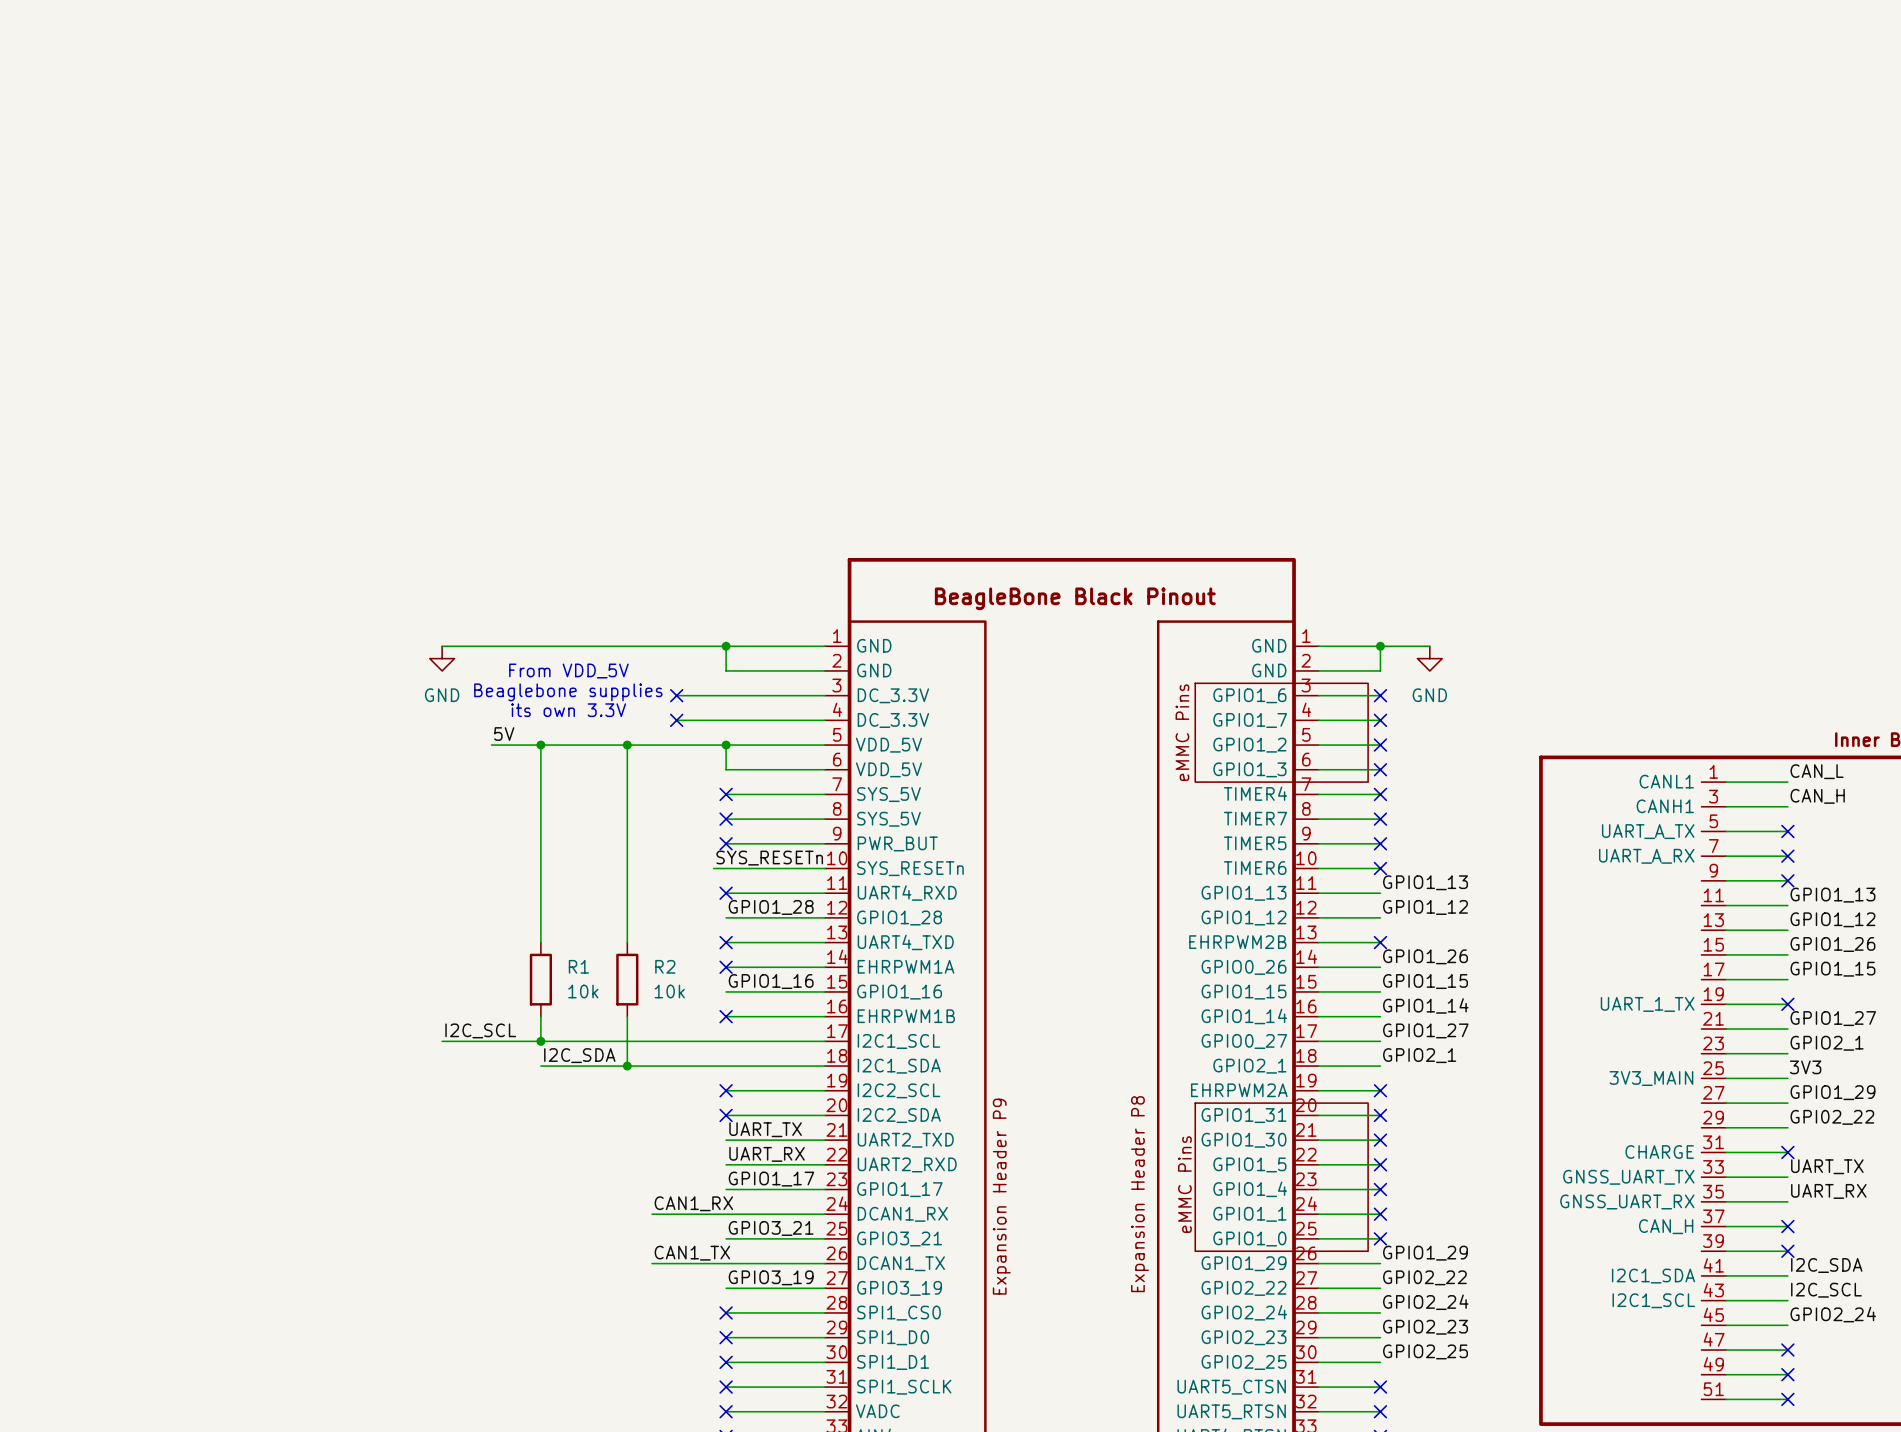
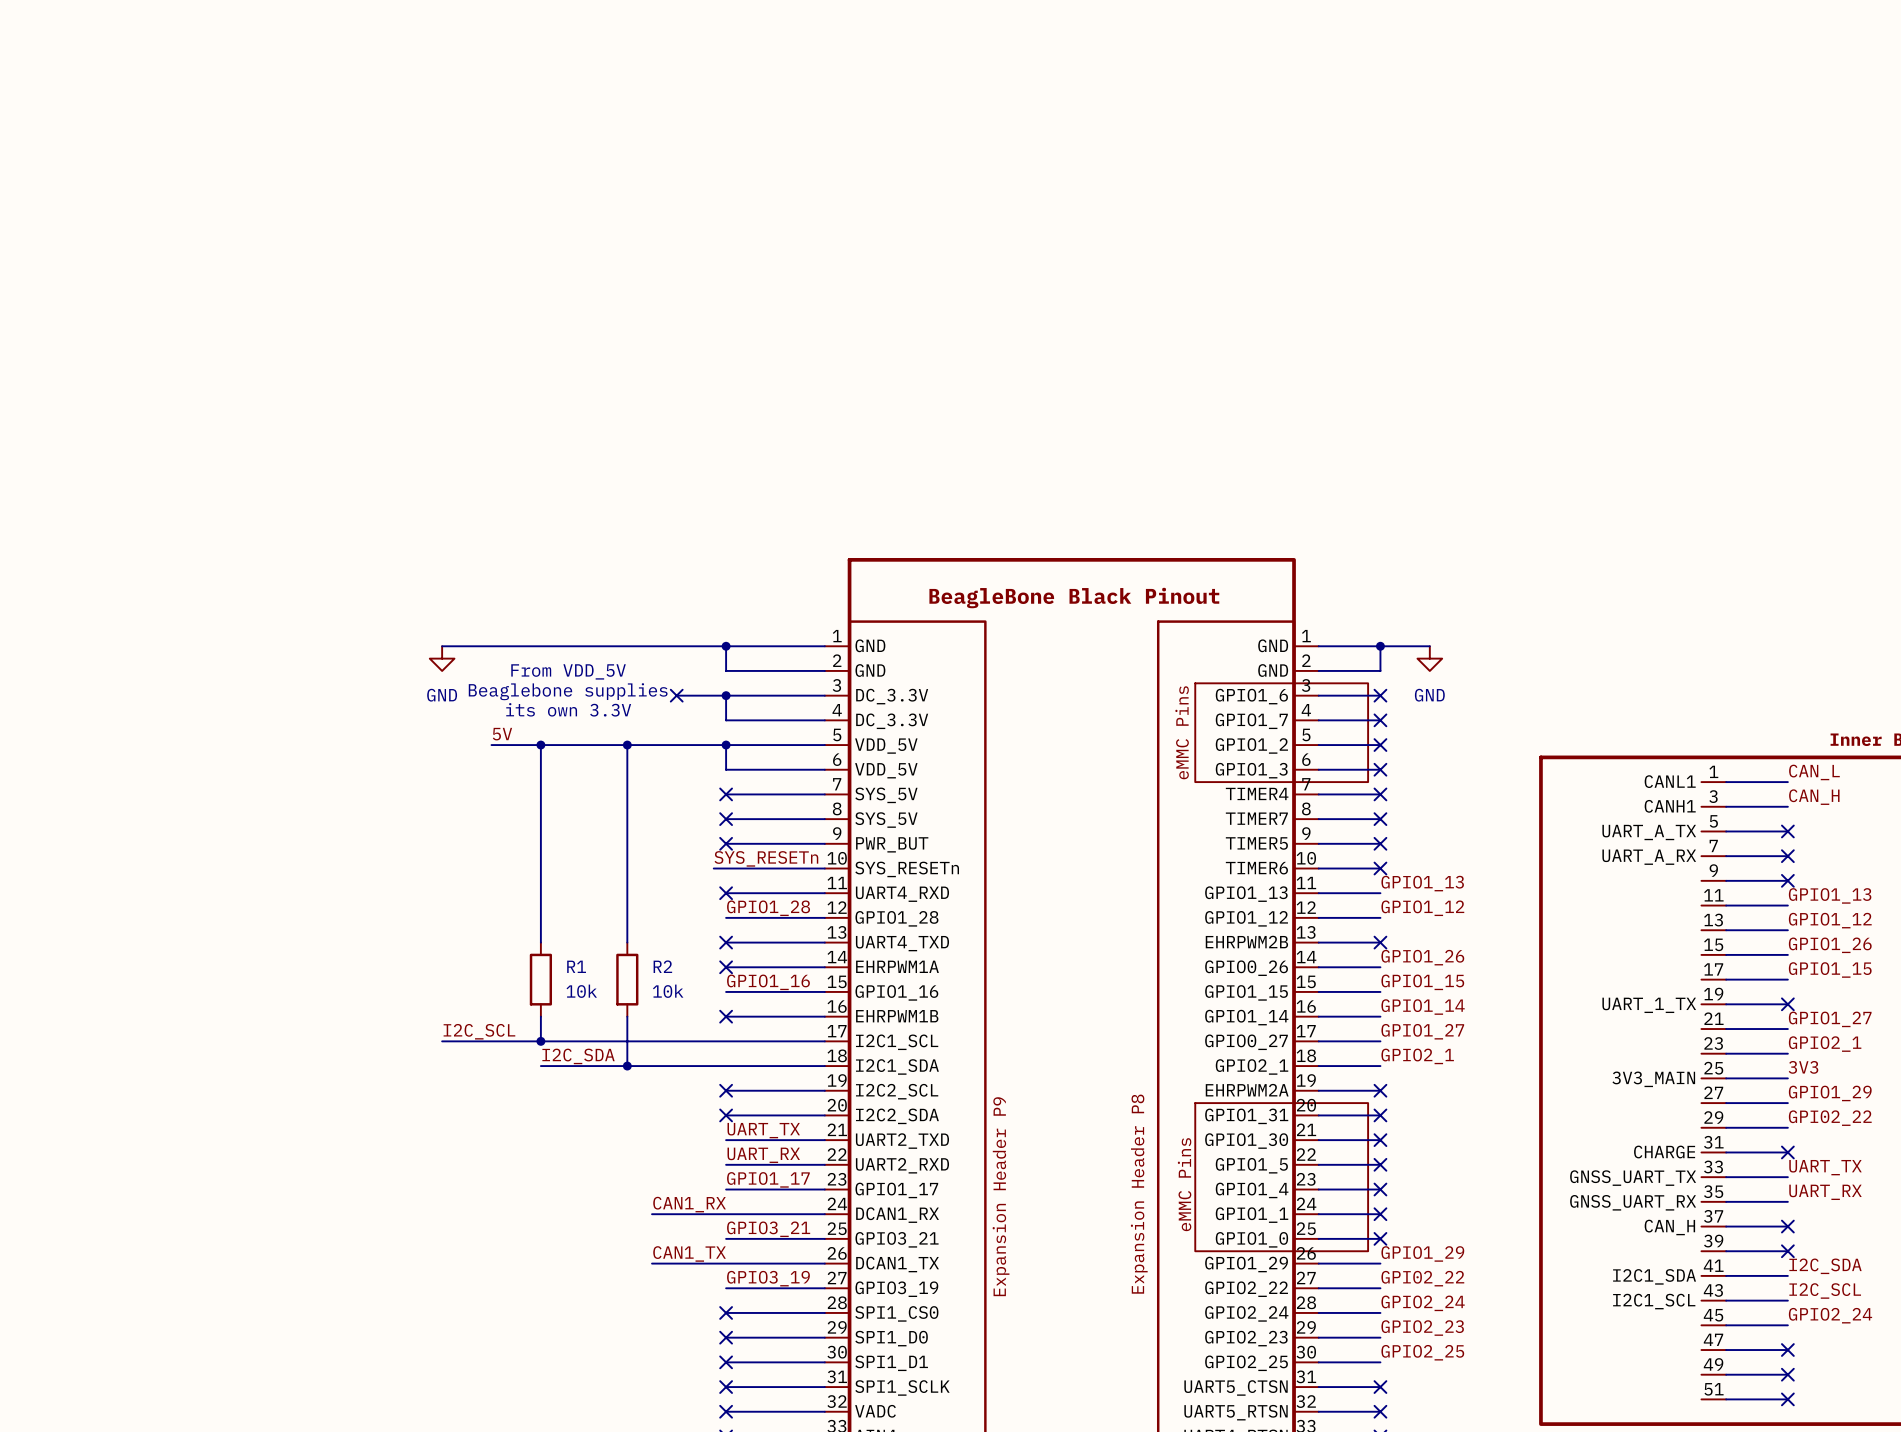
junction: none -> (726, 695)
wire: (676, 720) (726, 720) -> (726, 695) (726, 720)
no-connect mark: (676, 720) -> none

